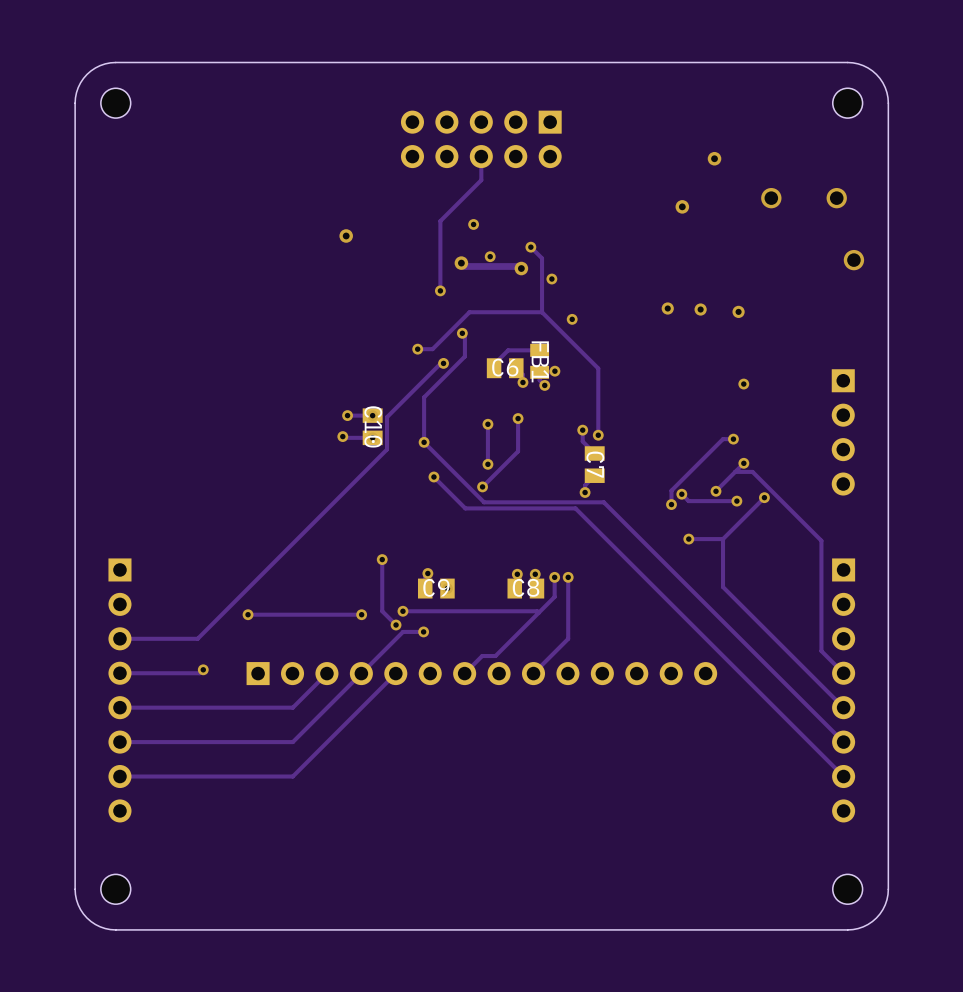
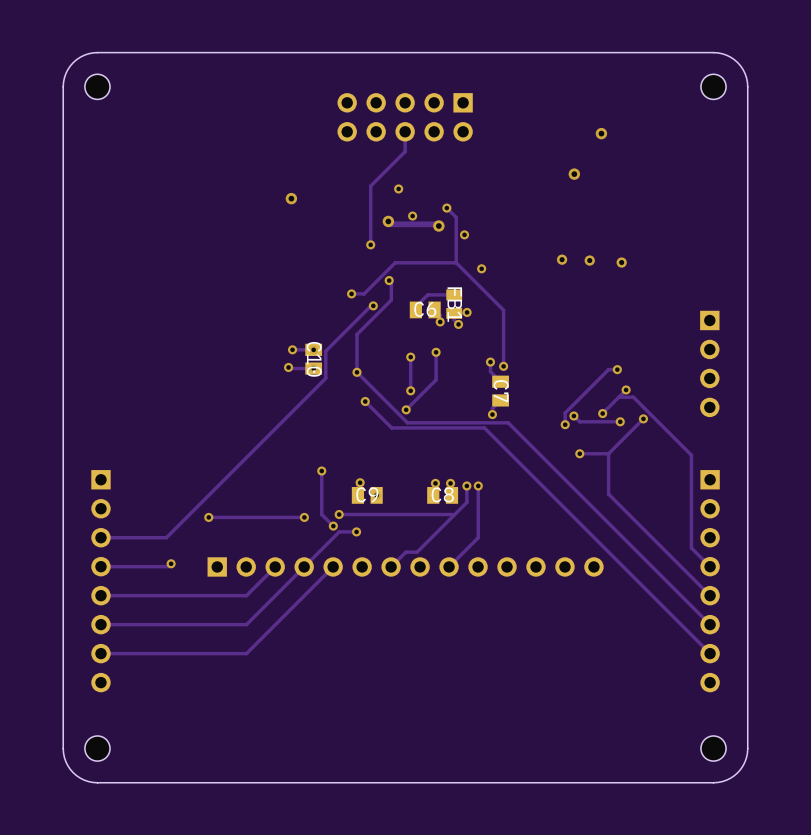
via: (771, 198) -> none
via: (836, 198) -> none
via: (853, 260) -> none
via: (743, 384) -> none

